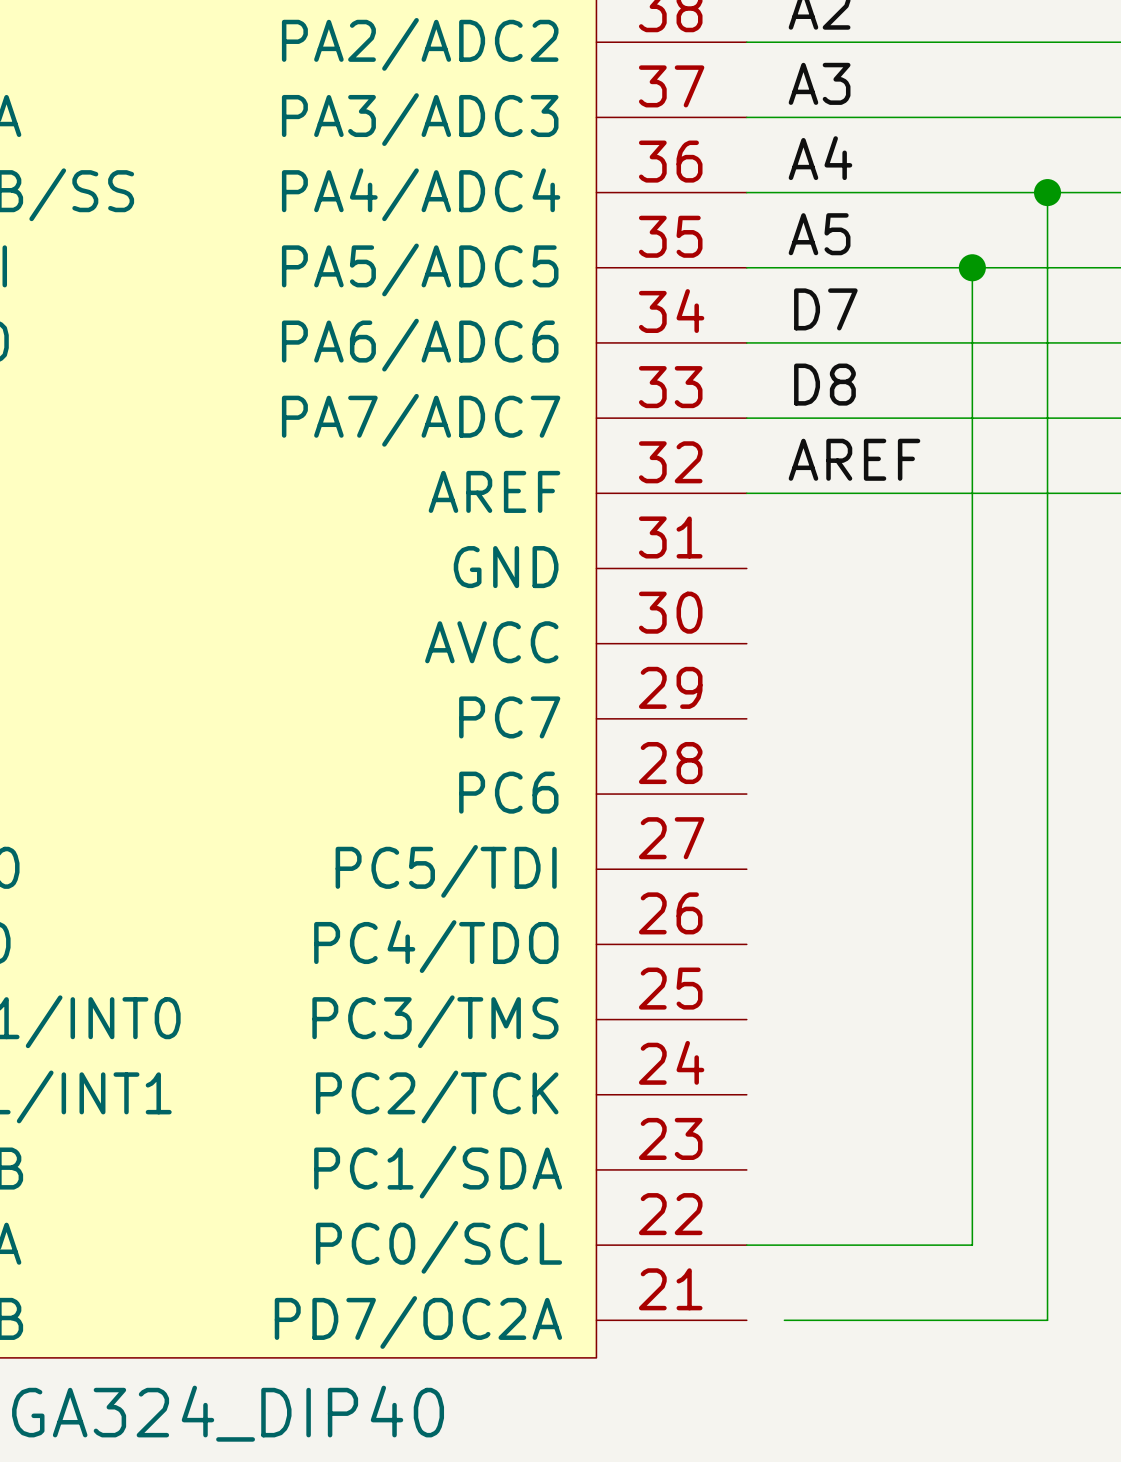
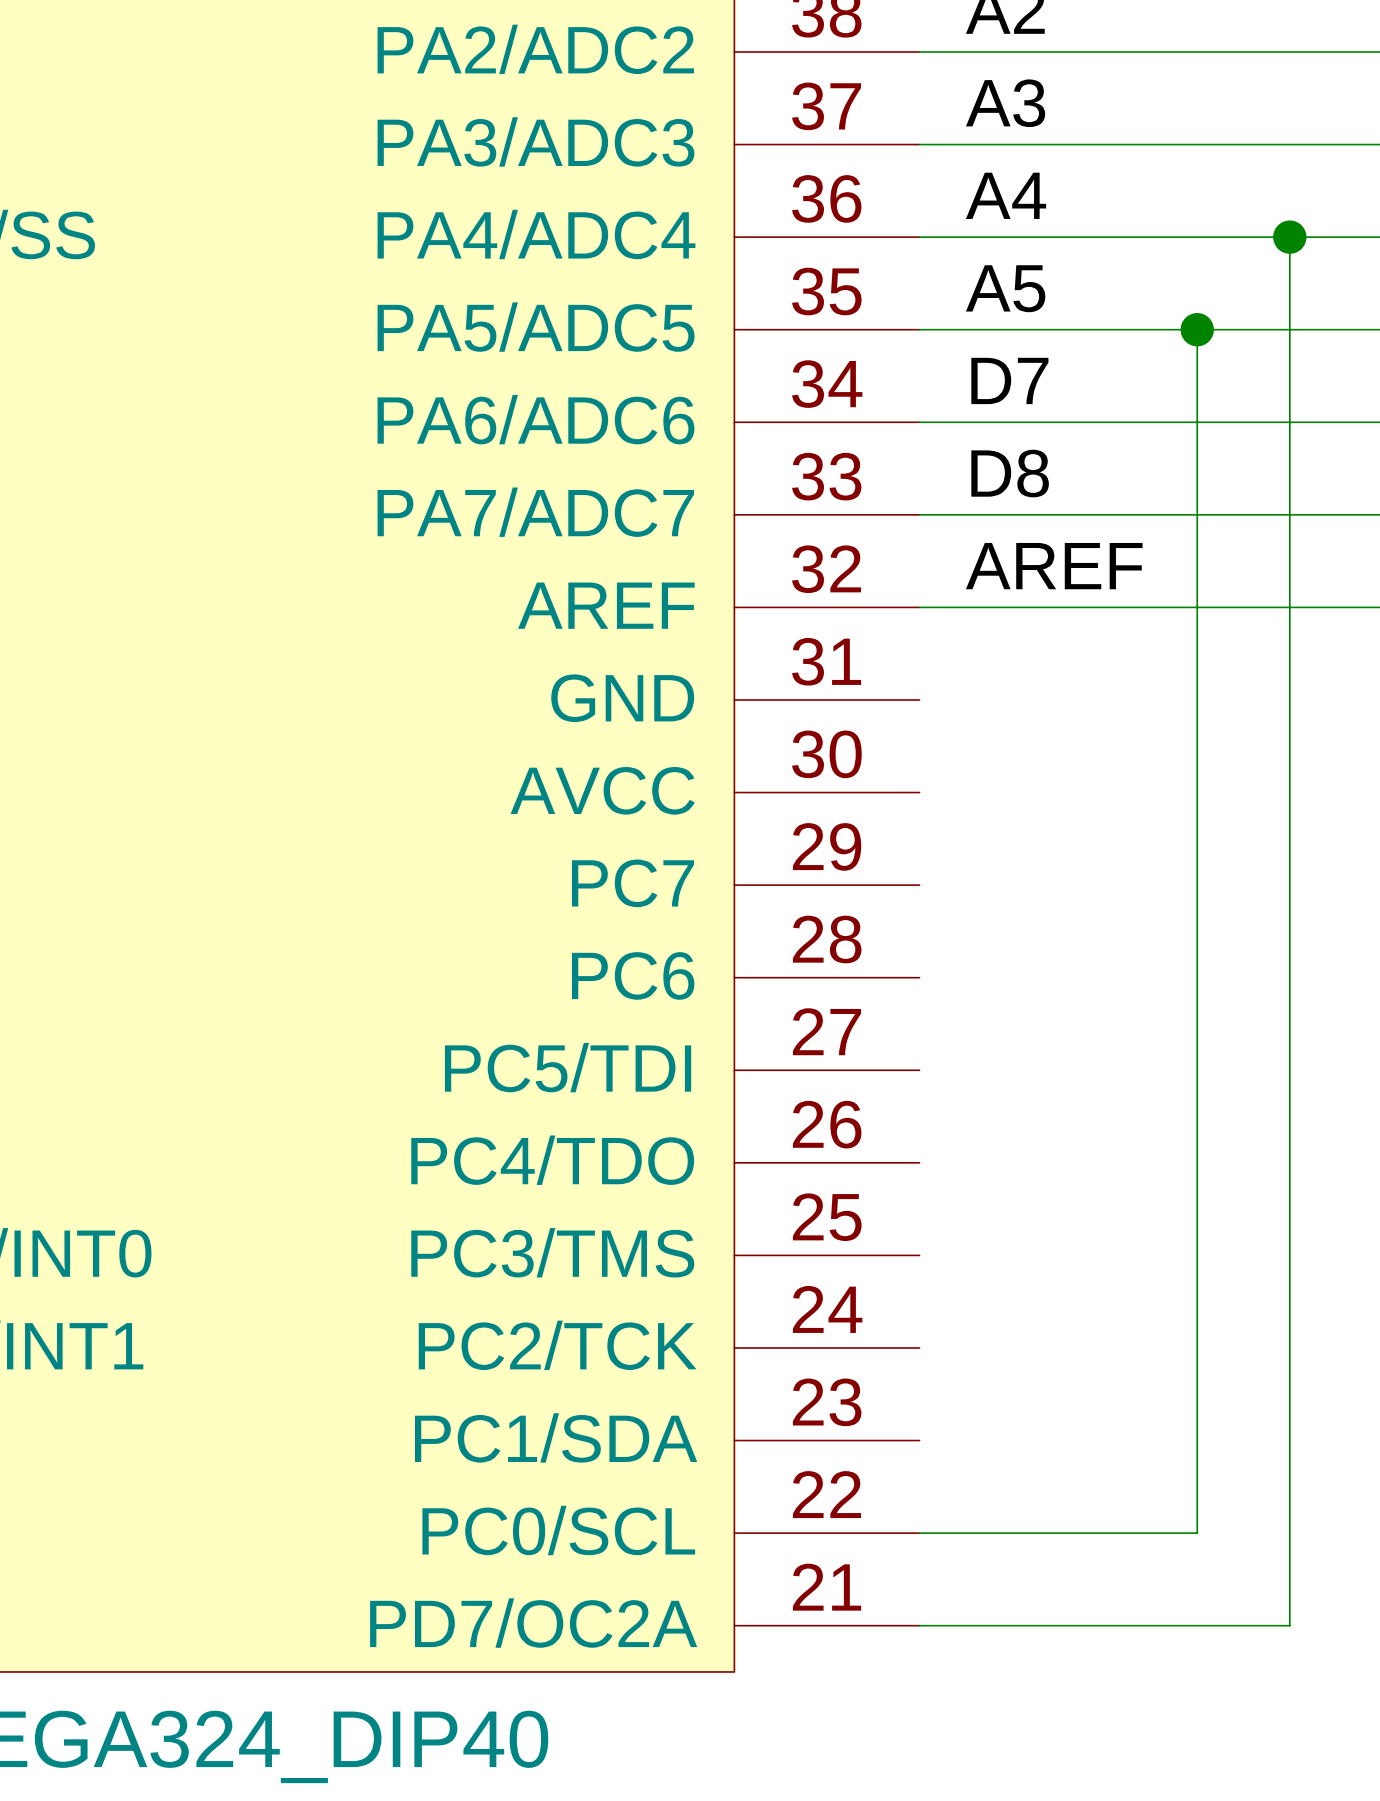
wire: none -> (919, 1625) (965, 1625)

